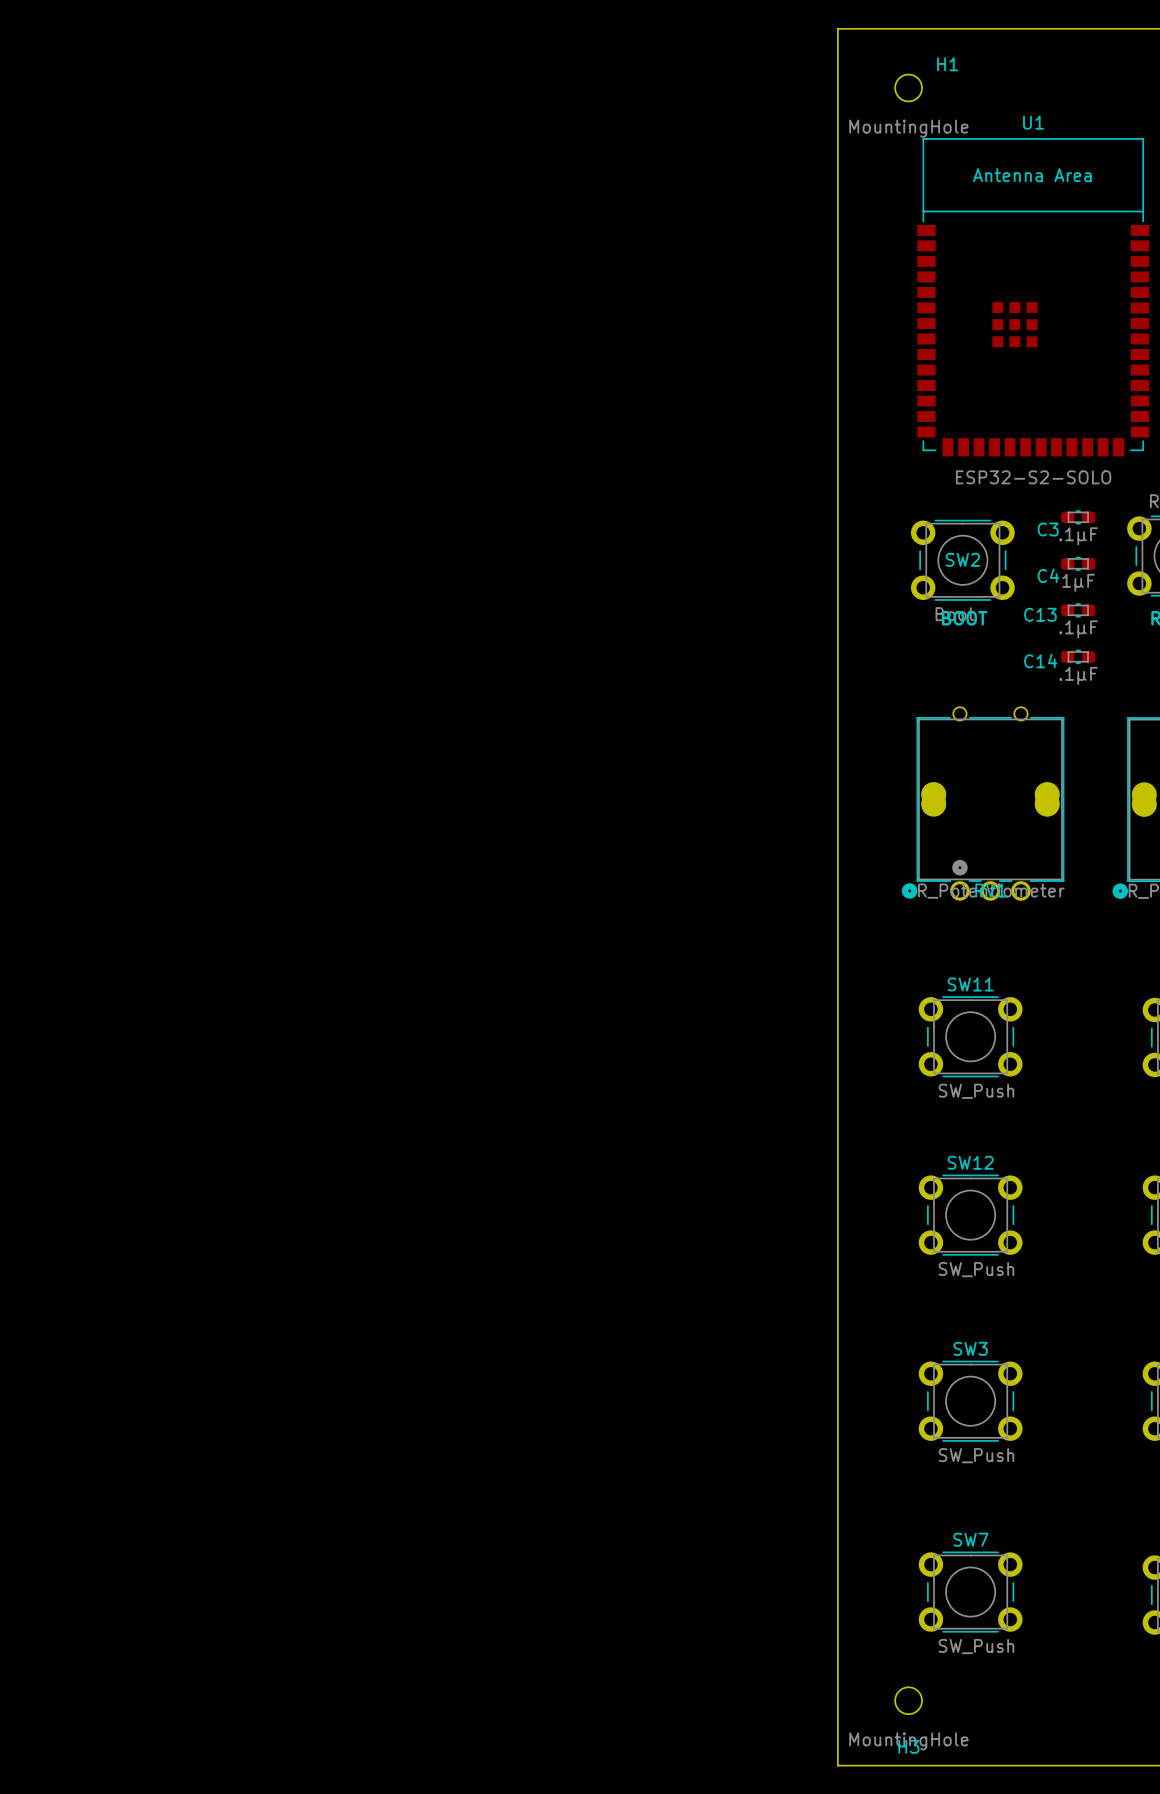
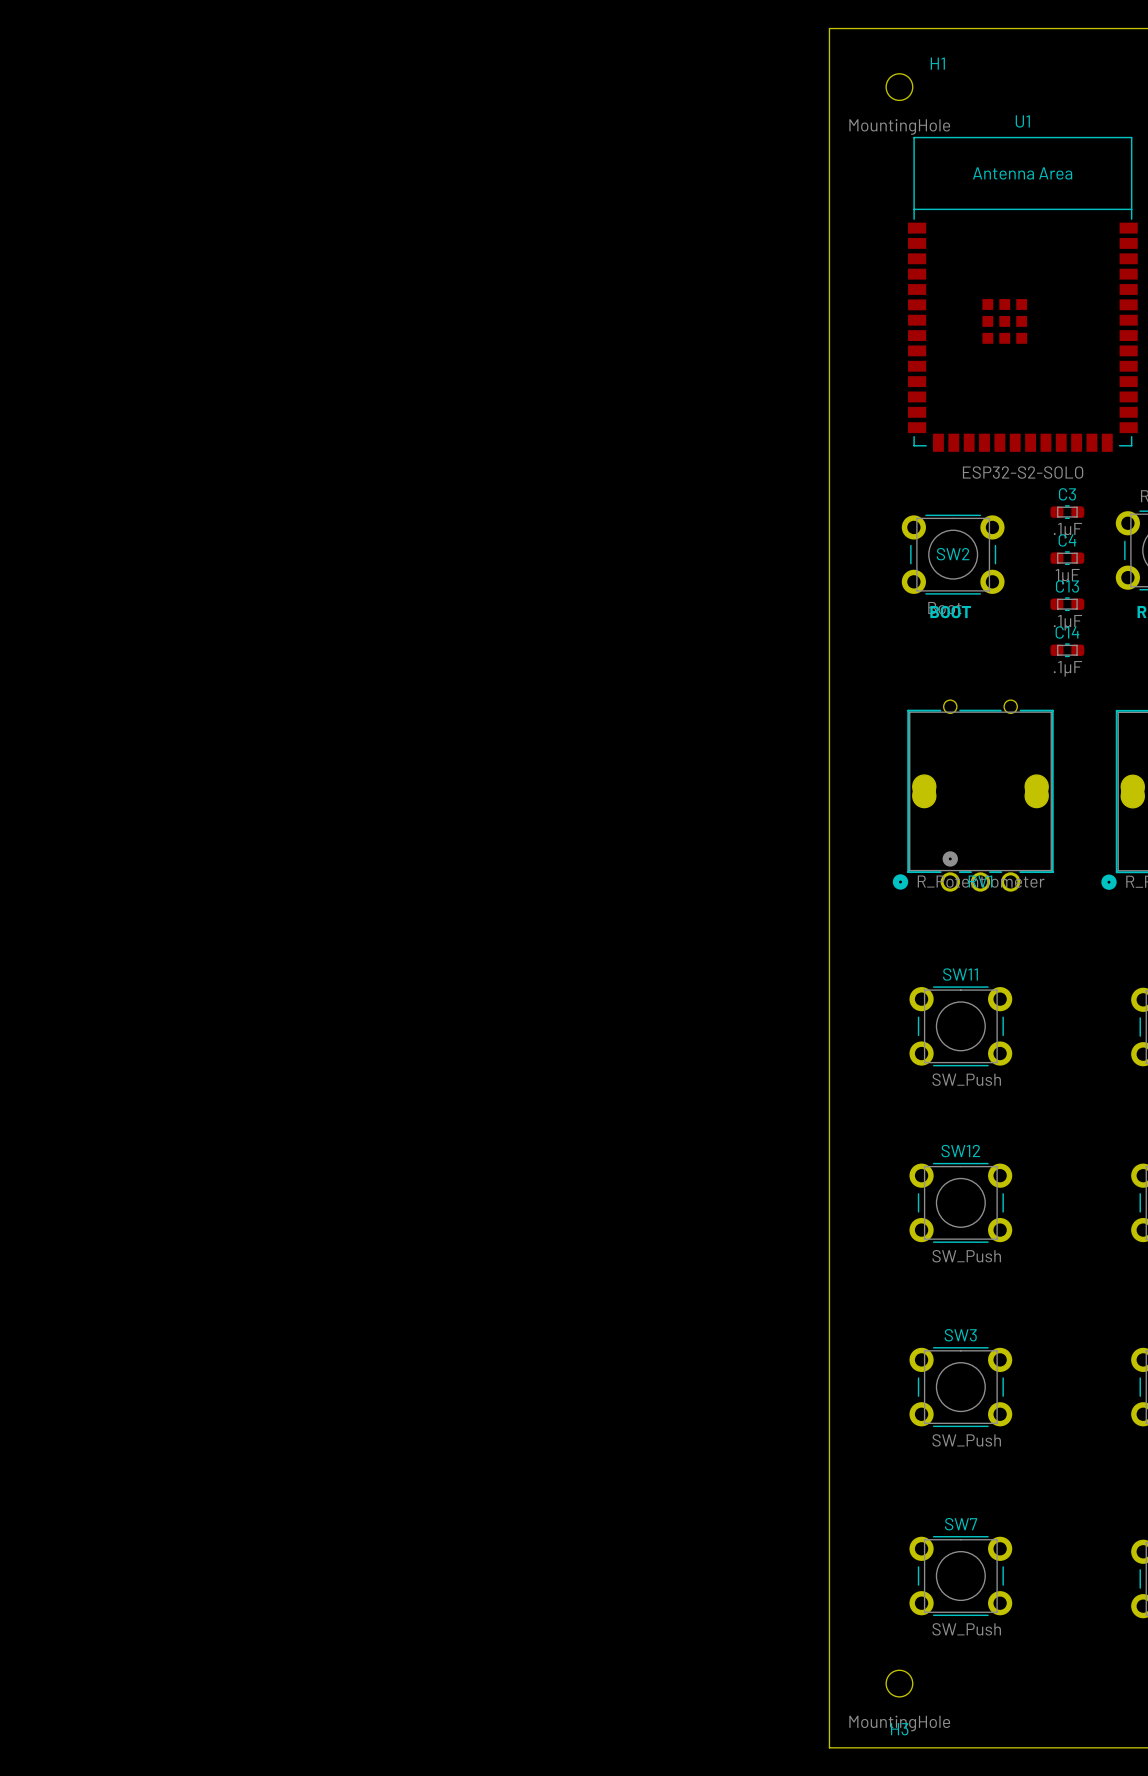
C3 name position: C3 (1048, 529) -> C3 (1067, 494)
C4 name position: C4 (1048, 575) -> C4 (1067, 540)
C13 name position: C13 (1040, 614) -> C13 (1067, 586)
C14 name position: C14 (1040, 661) -> C14 (1067, 632)

